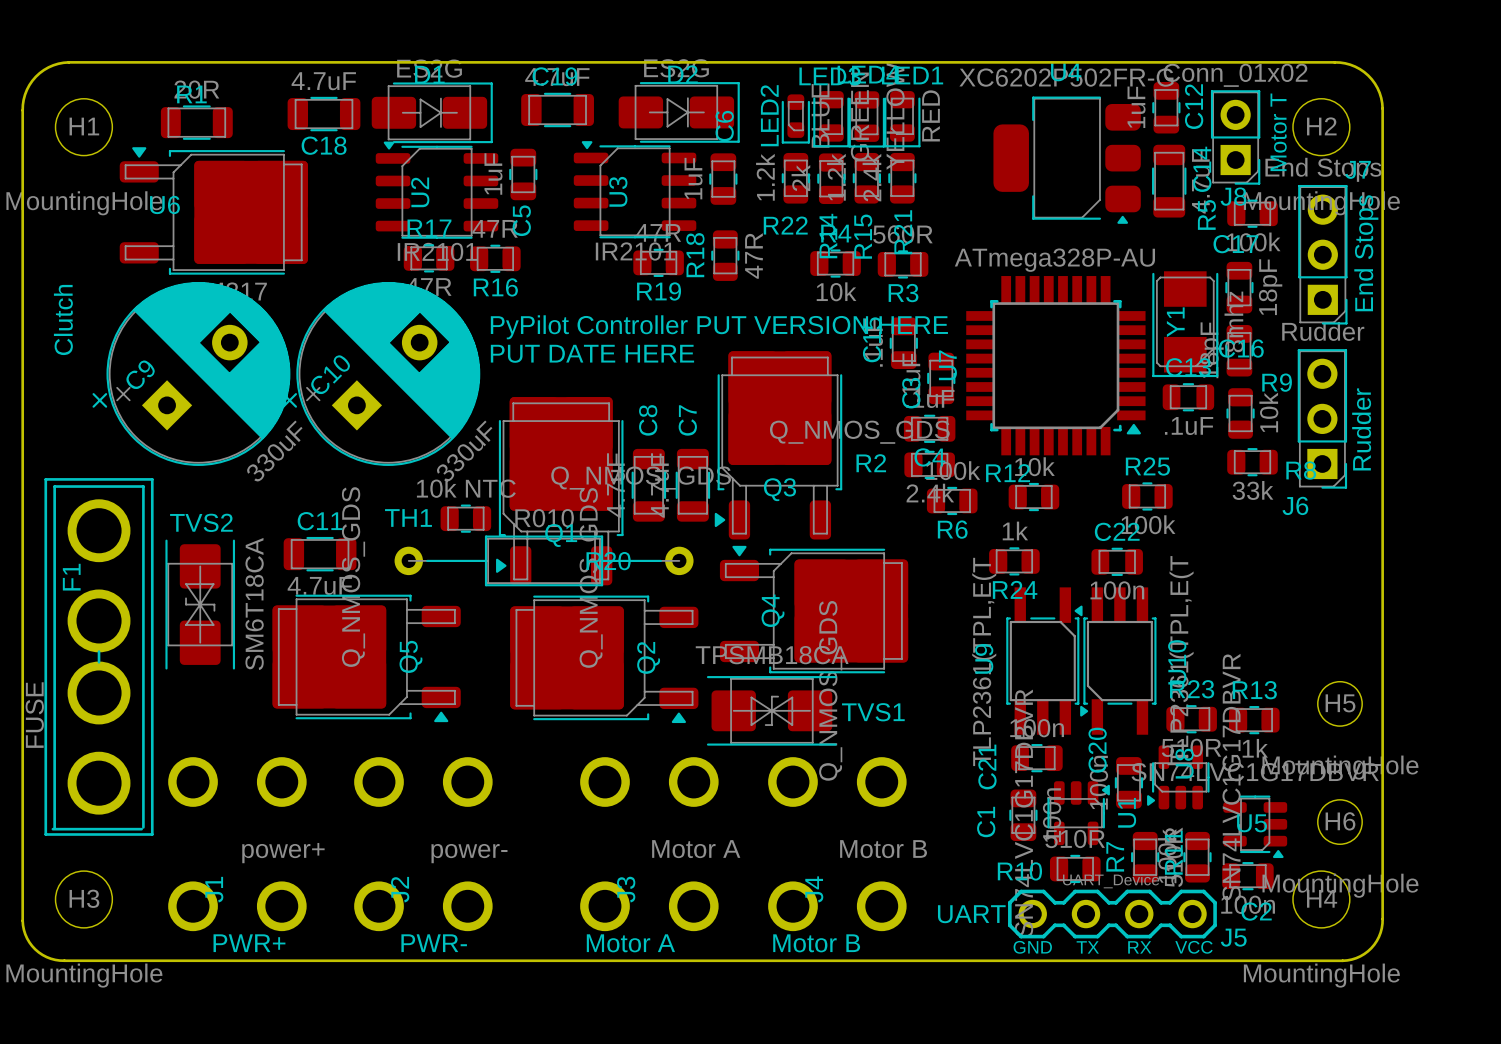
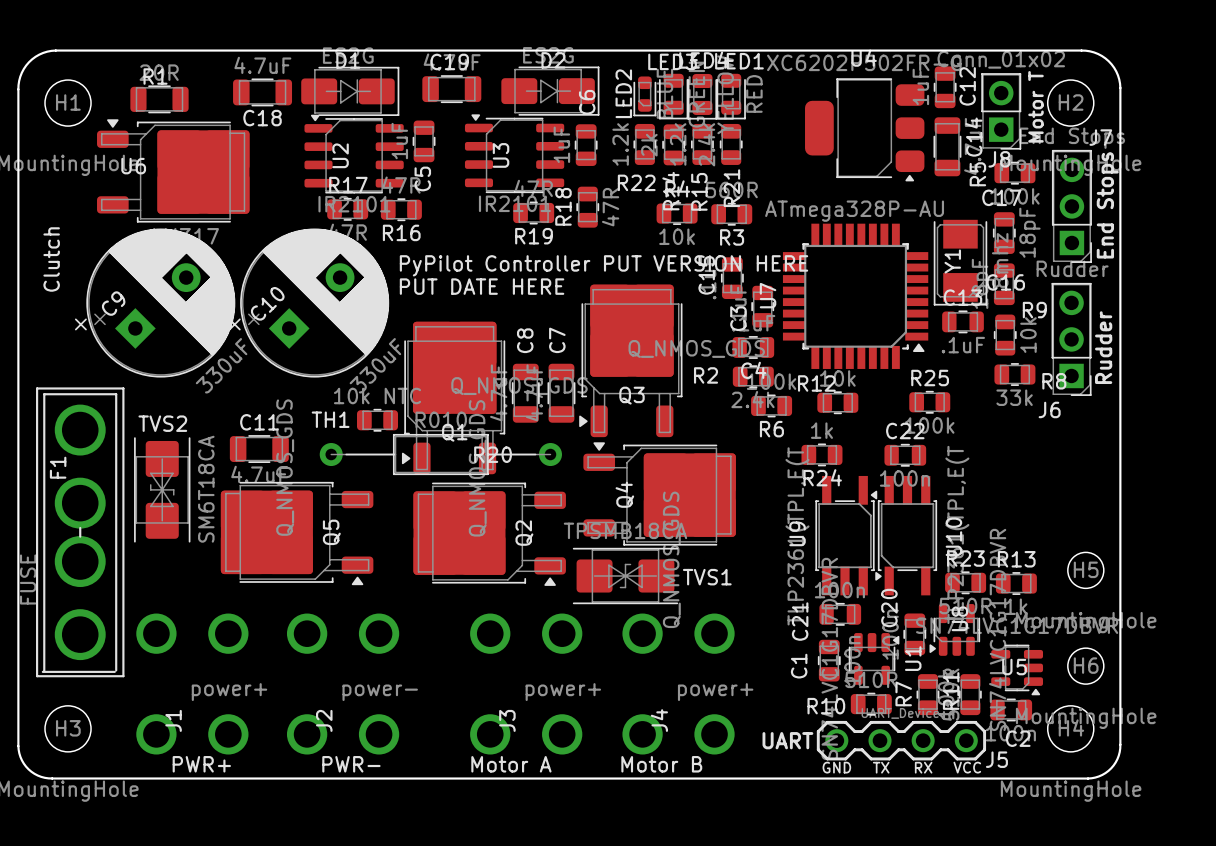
J3 value: Motor A (696, 849) -> power+ (563, 692)
J4 value: Motor B (883, 849) -> power+ (715, 692)

